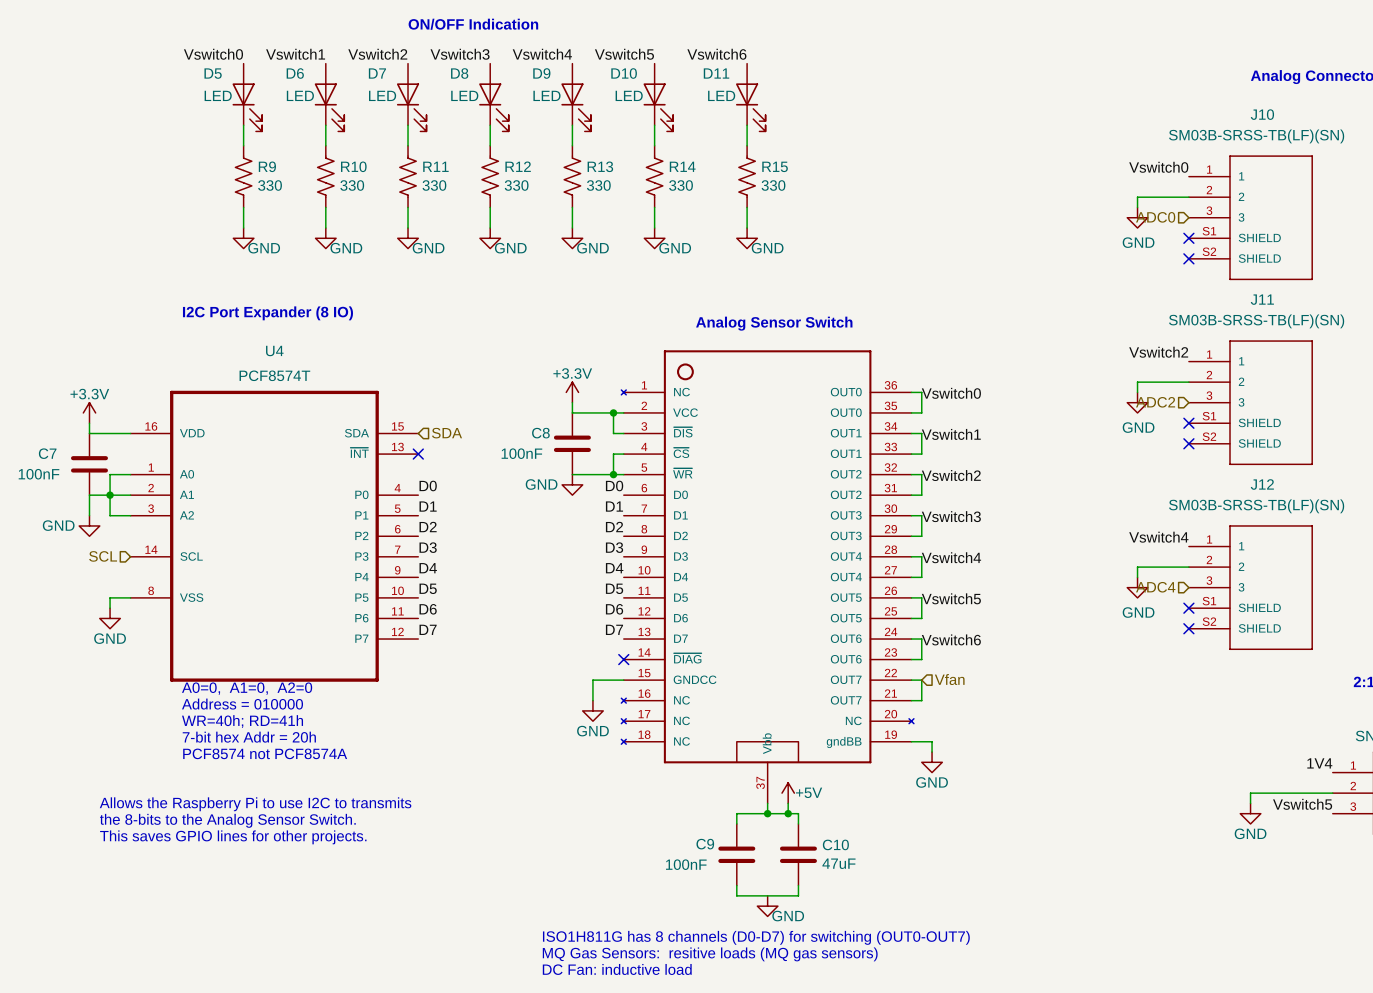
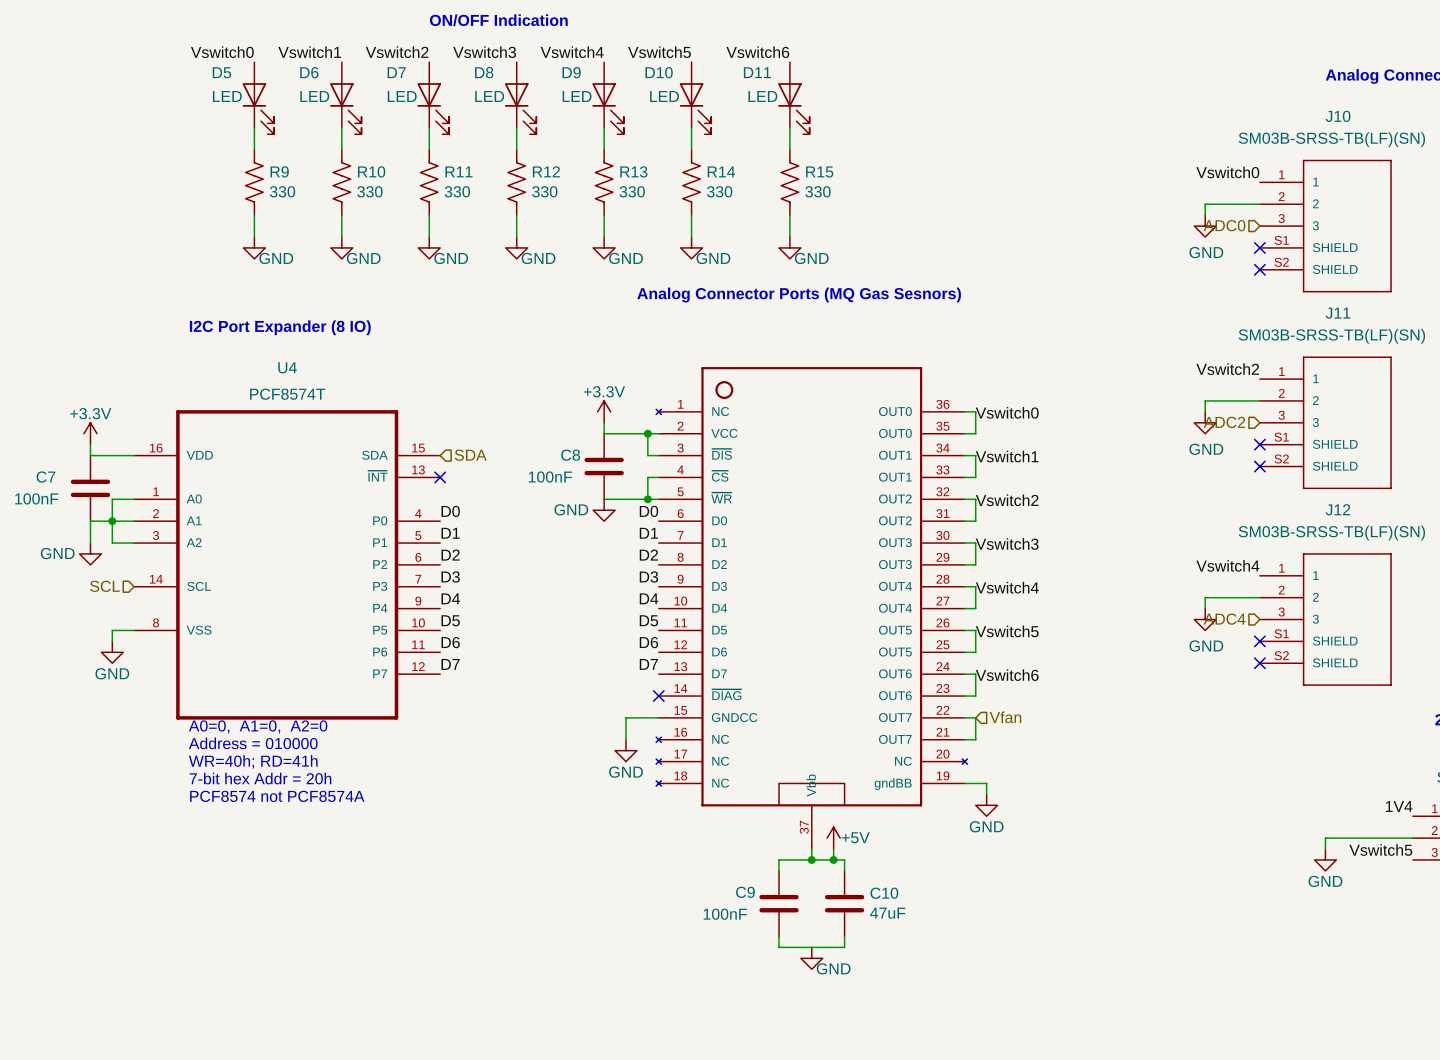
text: none -> Analog Connector Ports (MQ Gas Sesnors) (799, 295)
text: Analog Sensor Switch (774, 323) -> none
text: Allows the Raspberry Pi to use I2C to transmits (255, 804) -> none
text: the 8-bits to the Analog Sensor Switch. (227, 820) -> none
text: This saves GPIO lines for other projects. (233, 837) -> none
text: ISO1H811G has 8 channels (D0-D7) for switching (OUT0-OUT7) (756, 937) -> none
text: MQ Gas Sensors: resitive loads (MQ gas sensors) (710, 954) -> none
text: DC Fan: inductive load (617, 969) -> none

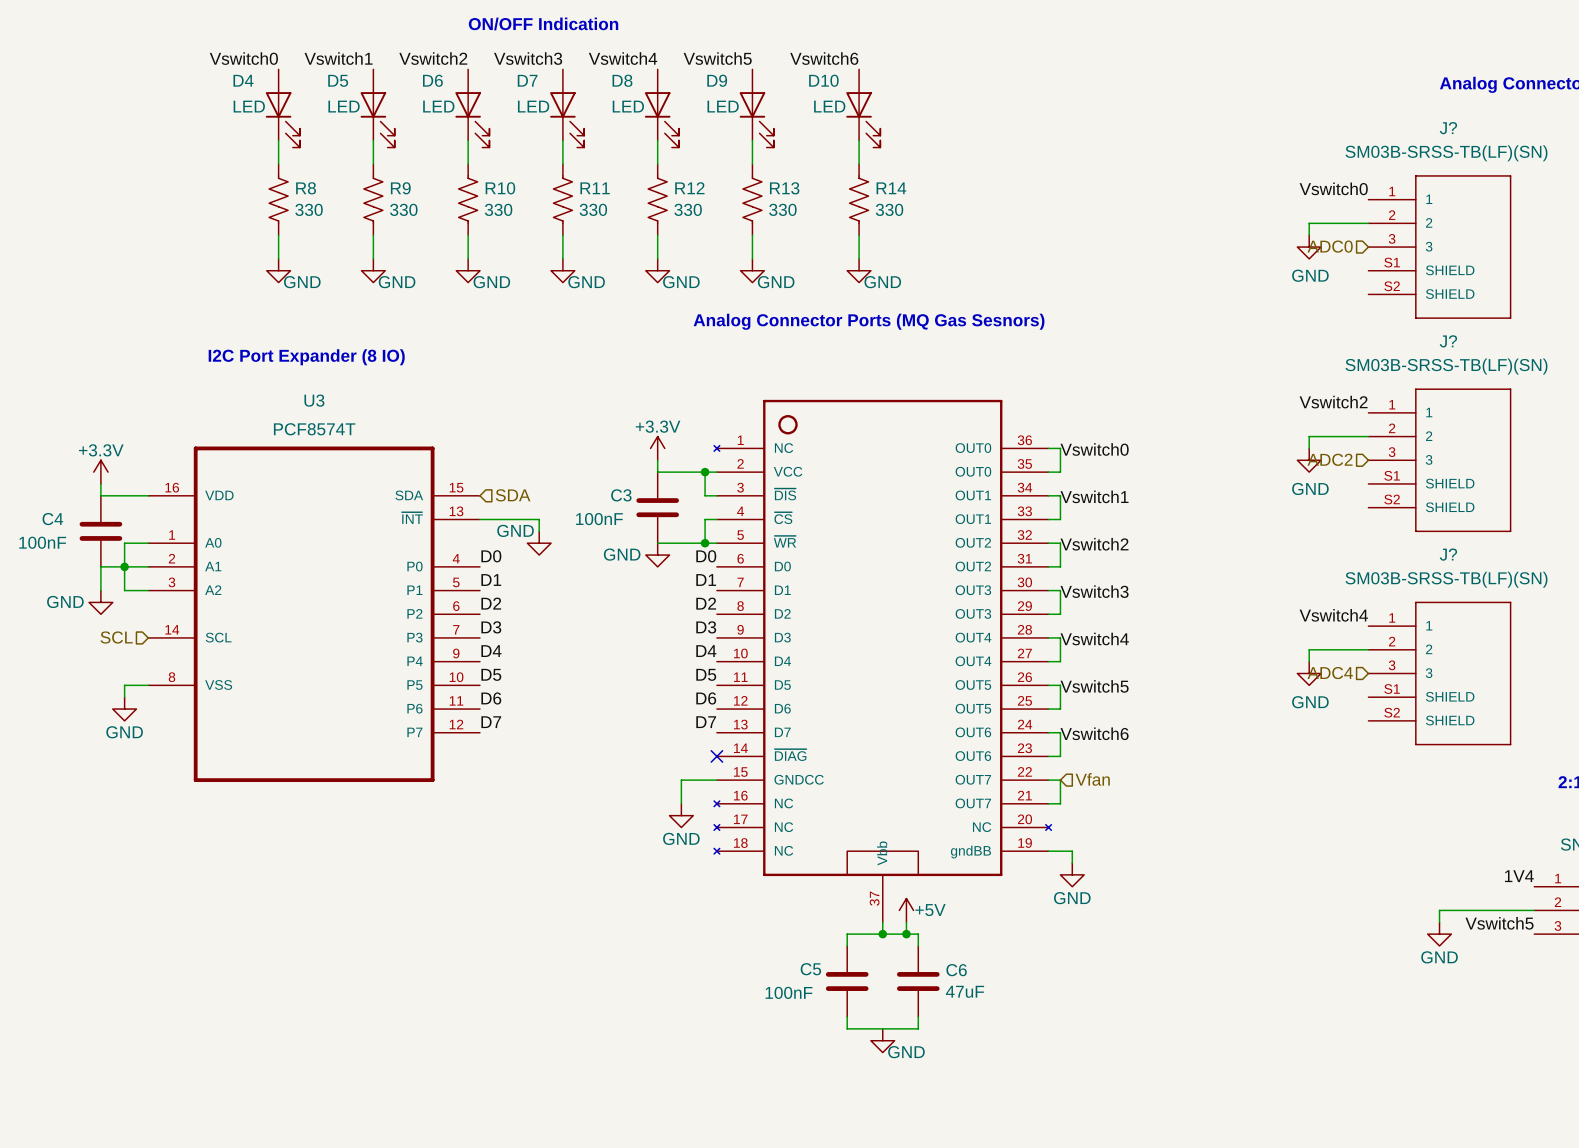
D5 name: D5 (221, 72) -> D4 (243, 80)
D6 name: D6 (309, 72) -> D5 (338, 80)
D7 name: D7 (396, 72) -> D6 (432, 80)
D8 name: D8 (484, 72) -> D7 (527, 80)
D9 name: D9 (571, 72) -> D8 (622, 80)
D10 name: D10 (659, 72) -> D9 (717, 80)
D11 name: D11 (757, 72) -> D10 (823, 80)
J10 name: J10 (1338, 116) -> J? (1448, 128)
R9 name: R9 (279, 171) -> R8 (306, 188)
R10 name: R10 (371, 171) -> R9 (400, 188)
R11 name: R11 (458, 171) -> R10 (500, 188)
R12 name: R12 (546, 171) -> R11 (595, 188)
R13 name: R13 (633, 171) -> R12 (689, 188)
R14 name: R14 (721, 171) -> R13 (784, 188)
R15 name: R15 (819, 171) -> R14 (891, 188)
no-connect mark: (1259, 247) -> none
no-connect mark: (1259, 269) -> none
J11 name: J11 (1337, 313) -> J? (1448, 341)
U4 name: U4 (287, 367) -> U3 (314, 400)
no-connect mark: (1259, 444) -> none
C8 name: C8 (570, 455) -> C3 (621, 495)
no-connect mark: (1259, 466) -> none
C7 name: C7 (45, 477) -> C4 (52, 519)
wire: none -> (479, 519) (539, 519) (539, 531)
no-connect mark: (440, 477) -> none
power symbol: none -> GND (539, 543)
J12 name: J12 (1337, 509) -> J? (1448, 554)
no-connect mark: (1259, 641) -> none
no-connect mark: (1259, 663) -> none
text: A0=0, A1=0, A2=0 (258, 726) -> none
text: Address = 010000 (253, 743) -> none
text: WR=40h; RD=41h (253, 761) -> none
text: 7-bit hex Addr = 20h (260, 778) -> none
text: PCF8574 not PCF8574A (277, 796) -> none
C9 name: C9 (745, 892) -> C5 (810, 969)
C10 name: C10 (884, 893) -> C6 (956, 970)

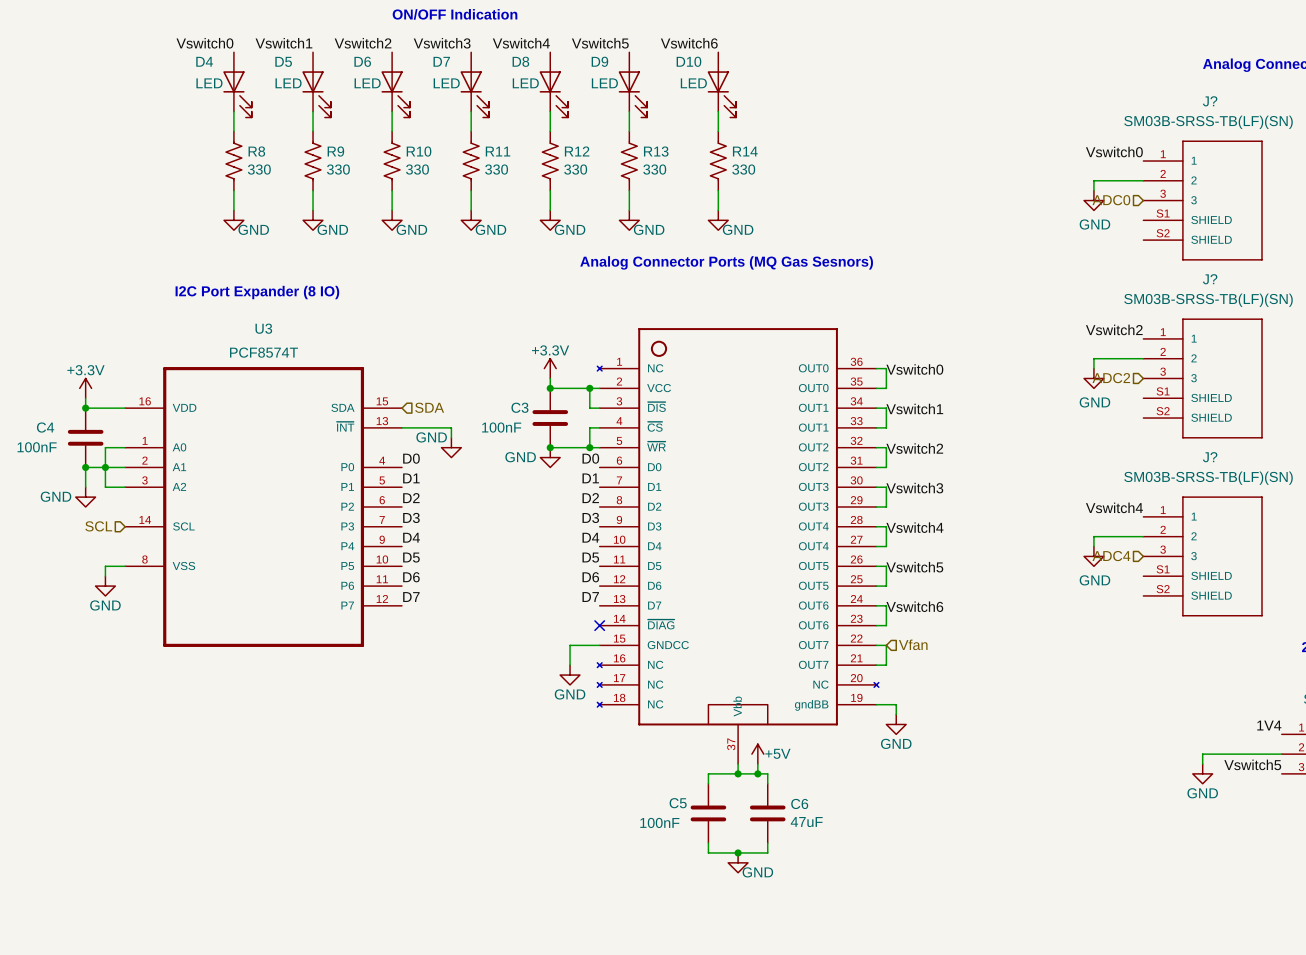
junction: none -> (550, 388)
junction: none -> (85, 408)
junction: none -> (550, 447)
junction: none -> (85, 467)
junction: none -> (738, 852)

